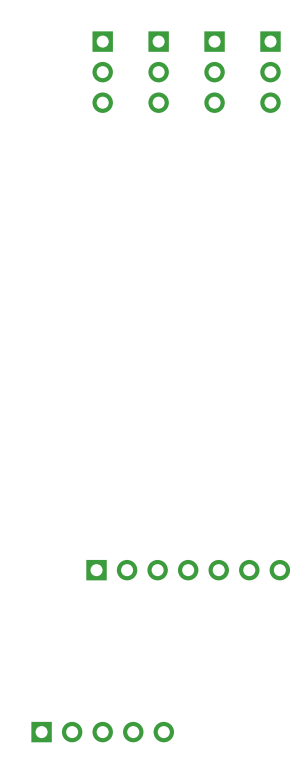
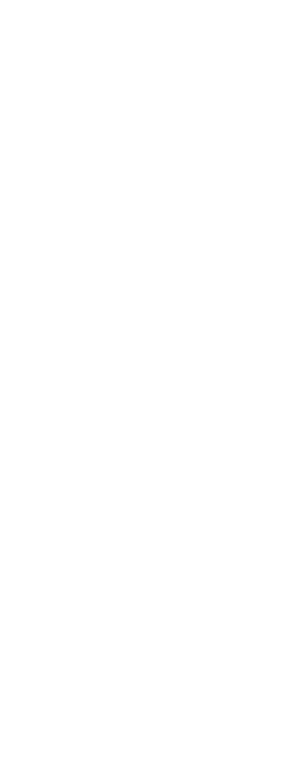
part: (102, 72) -> none
part: (158, 72) -> none
part: (214, 72) -> none
part: (270, 72) -> none
part: (188, 570) -> none
part: (102, 732) -> none

